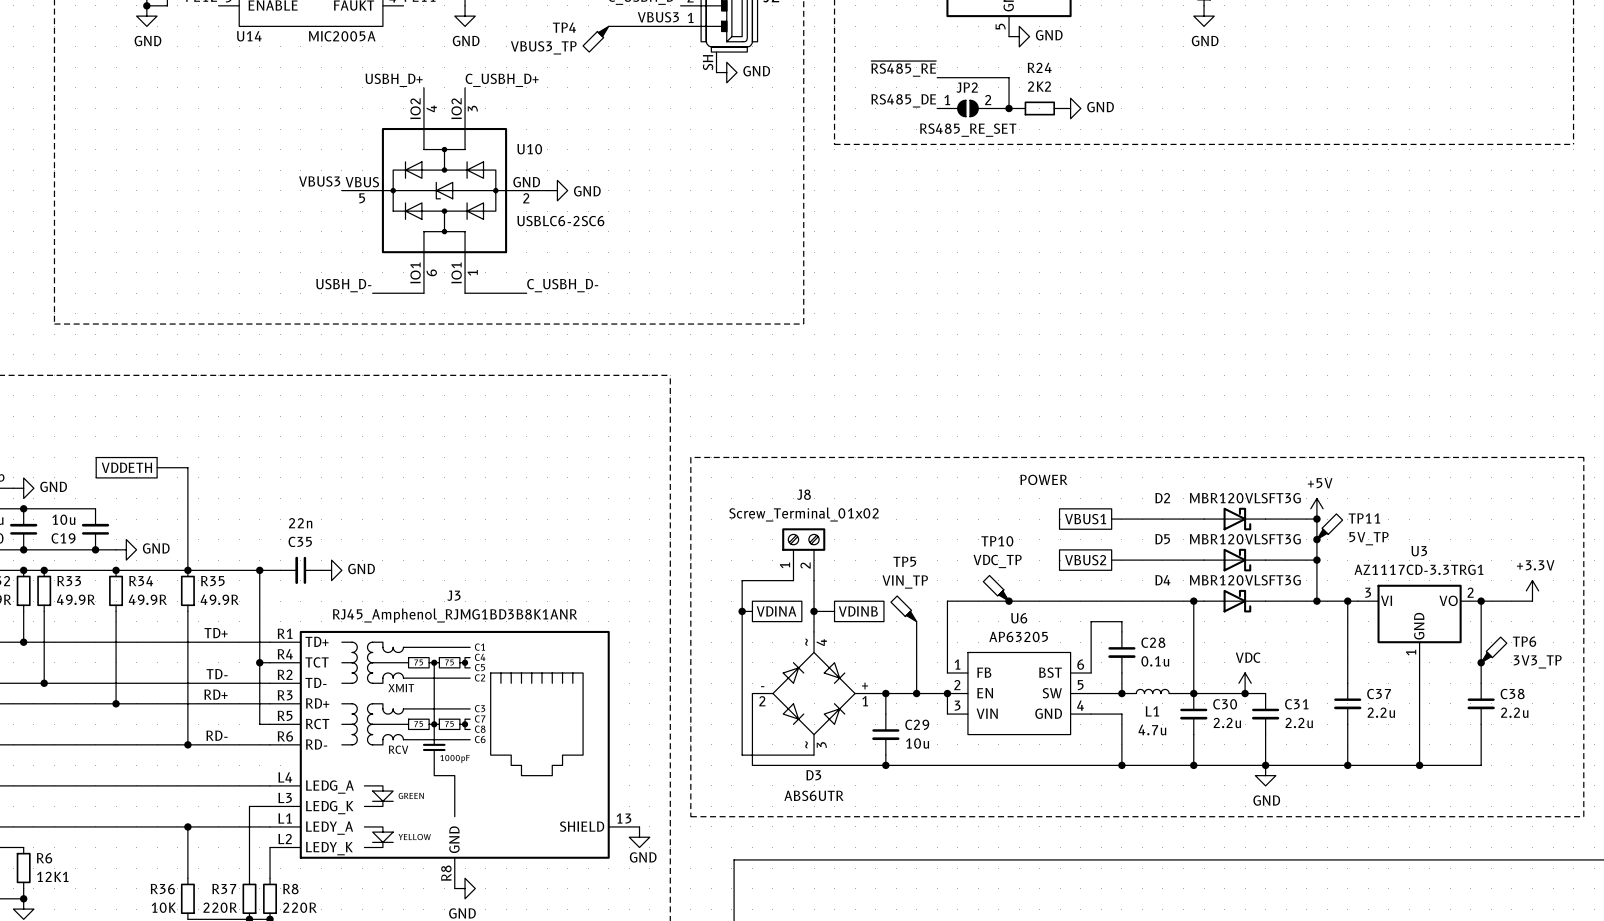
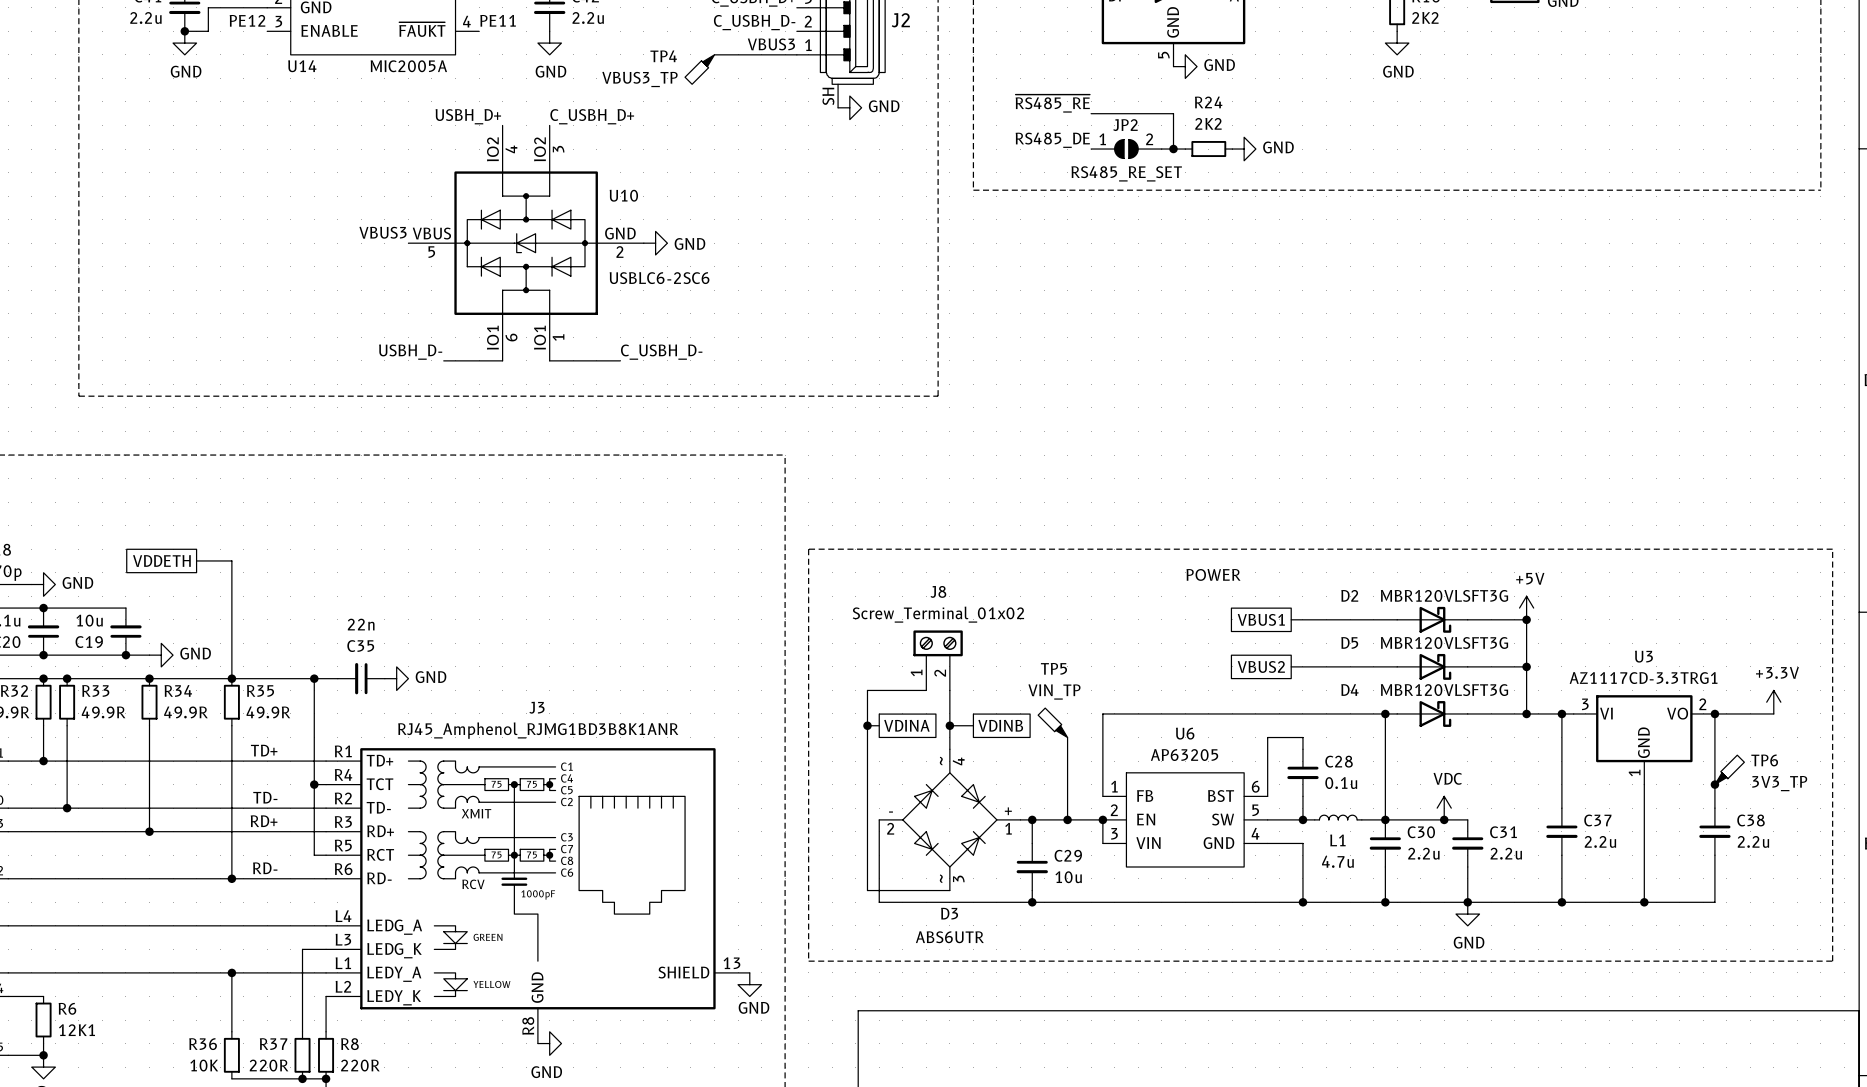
TP11: 5V_TP (1329, 526) -> none
junction: (1316, 539) -> none
TP10: VDC_TP (996, 588) -> none
junction: (1009, 601) -> none

